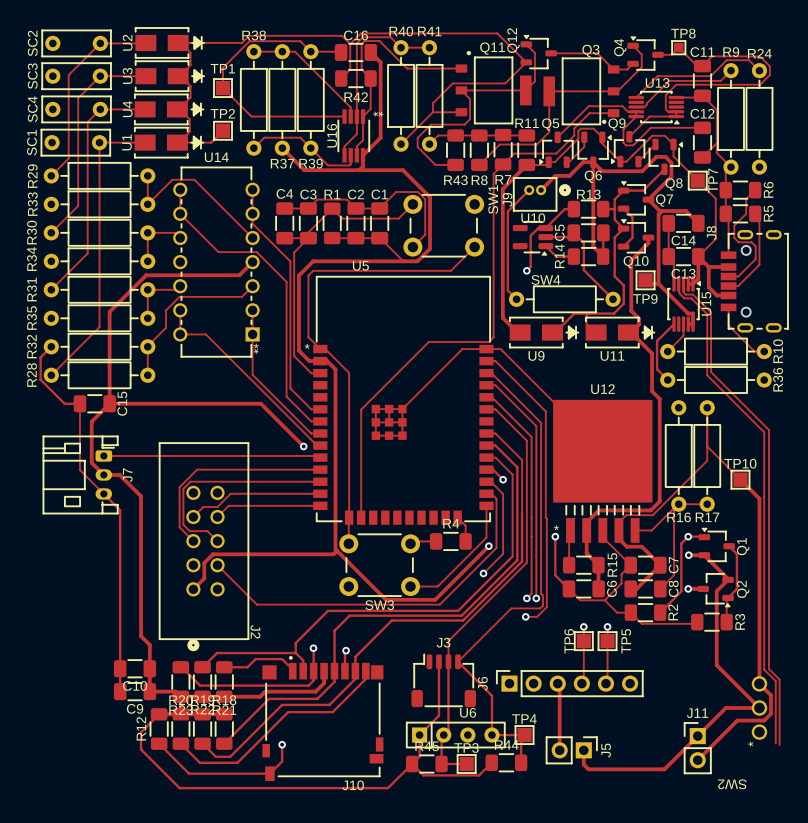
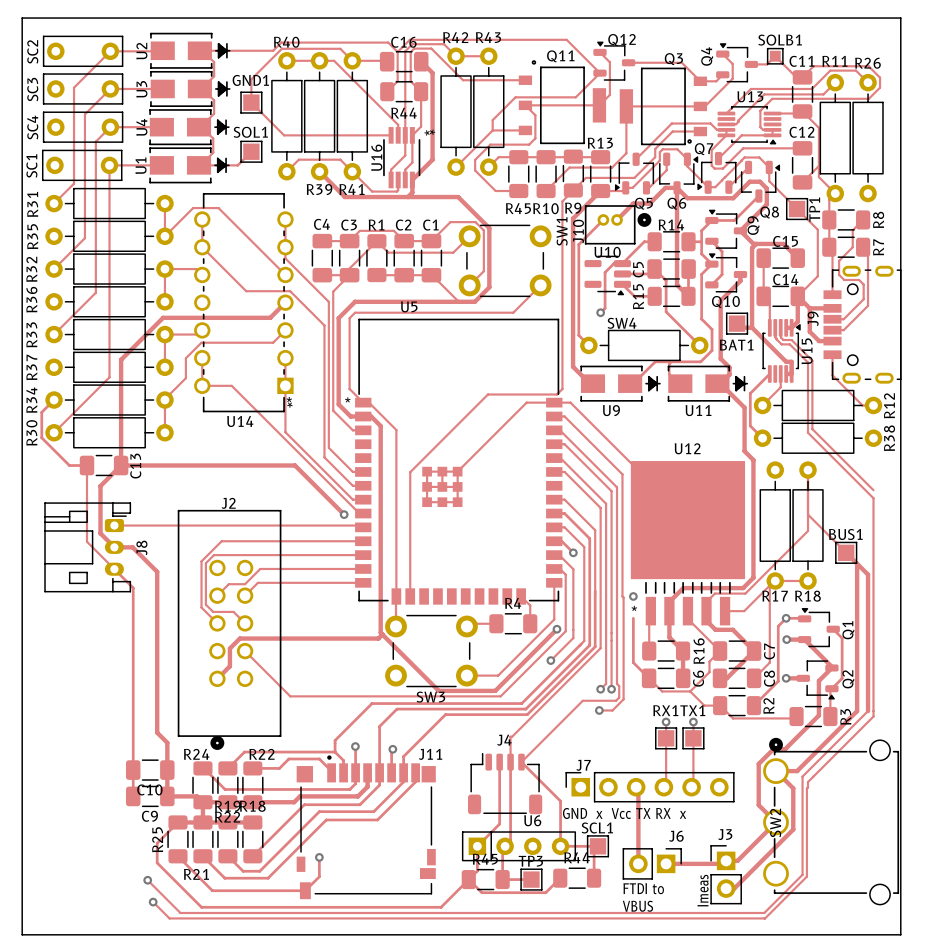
board edge: none -> (22, 18) (900, 18) (900, 934) (22, 934) (22, 18)
R40 name: R40 (401, 31) -> R42 (455, 37)
R41 name: R41 (429, 31) -> R43 (488, 37)
TP8 name: TP8 (683, 33) -> SOLB1 (780, 40)
R38 name: R38 (254, 35) -> R40 (286, 42)
Q12 name rotation: 0° (513, 40) -> 90° clockwise (622, 39)
R9 name: R9 (731, 52) -> R11 (834, 61)
R24 name: R24 (759, 53) -> R26 (867, 63)
TP1 name: TP1 (222, 68) -> GND1 (250, 80)
R42 name: R42 (356, 97) -> R44 (404, 113)
TP2 name: TP2 (222, 113) -> SOL1 (250, 132)
R11 name: R11 (527, 123) -> R13 (600, 143)
Q5 name position: Q5 (550, 124) -> Q5 (643, 203)
Q9 name rotation: 0° (617, 124) -> 90° counterclockwise (753, 225)
Q9 name position: Q9 (617, 124) -> Q9 (753, 225)
U14 name position: U14 (216, 157) -> U14 (240, 421)
R37 name: R37 (282, 163) -> R39 (319, 189)
R39 name: R39 (311, 163) -> R41 (352, 189)
R29 name: R29 (32, 176) -> R31 (32, 204)
R7 name: R7 (503, 179) -> R9 (573, 208)
R43 name: R43 (455, 180) -> R45 (518, 208)
R8 name: R8 (479, 180) -> R10 (545, 208)
TP7 name: TP7 (713, 180) -> TP1 (814, 209)
R6 name: R6 (768, 189) -> R8 (878, 219)
R13 name: R13 (588, 194) -> R14 (671, 224)
J9 name: J9 (507, 199) -> J10 (578, 231)
Q7 name position: Q7 (664, 200) -> Q7 (704, 149)
R33 name: R33 (32, 204) -> R35 (32, 236)
R5 name: R5 (768, 213) -> R7 (878, 247)
R30 name: R30 (31, 232) -> R32 (31, 269)
J8 name: J8 (711, 233) -> J9 (813, 318)
C14 name: C14 (683, 240) -> C15 (785, 241)
R14 name: R14 (559, 256) -> R15 (638, 296)
R34 name: R34 (31, 259) -> R36 (31, 299)
C13 name: C13 (683, 273) -> C14 (785, 279)
R31 name: R31 (31, 289) -> R33 (31, 334)
TP9 name: TP9 (645, 298) -> BAT1 (736, 345)
R35 name: R35 (31, 318) -> R37 (31, 367)
R32 name: R32 (31, 346) -> R34 (31, 400)
R10 name: R10 (778, 351) -> R12 (889, 405)
R28 name: R28 (31, 375) -> R30 (31, 432)
R36 name: R36 (778, 379) -> R38 (889, 438)
C15 name: C15 (122, 403) -> C13 (135, 466)
track: (764, 425) (768, 430) (768, 668) (779, 679) (779, 745) -> none
TP10 name: TP10 (740, 463) -> BUS1 (845, 534)
J7 name: J7 (127, 475) -> J8 (141, 547)
track: none -> (857, 563) (857, 711) (797, 771) (776, 771) (793, 788) (793, 829) (734, 888) (726, 888)
R16 name: R16 (679, 517) -> R17 (775, 596)
R17 name: R17 (707, 517) -> R18 (807, 596)
via position: (555, 536) -> (633, 596)
R15 name: R15 (612, 564) -> R16 (699, 651)
track: (759, 617) (759, 683) (770, 695) (770, 713) (764, 720) (737, 720) (697, 760) -> (868, 711) (802, 776) (802, 874) (764, 912) (180, 912) (147, 880)
track: (716, 621) (716, 665) (759, 707) (725, 707) (664, 769) (588, 769) (583, 764) (583, 750) -> (818, 715) (785, 749) (773, 749) (758, 763) (758, 805) (776, 822) (737, 860) (723, 860) (720, 863) (666, 863)
track: (764, 622) (764, 669) (775, 681) (775, 743) -> (873, 716) (808, 782) (806, 876) (765, 918) (169, 918) (153, 902)
J2 name rotation: 0° (255, 631) -> 90° counterclockwise (228, 503)
J2 name position: J2 (255, 631) -> J2 (228, 503)
TP6 name: TP6 (569, 641) -> RX1 (665, 710)
TP5 name: TP5 (626, 641) -> TX1 (692, 710)
J3 name: J3 (443, 642) -> J4 (504, 740)
SW2 footprint: [751, 676, 768, 740] -> [763, 737, 900, 905]
J6 name: J6 (482, 683) -> J7 (583, 765)
R20 name: R20 (181, 700) -> R21 (196, 874)
text: none -> GND x Vcc TX RX x (624, 813)
R23 name: R23 (181, 710) -> R24 (196, 754)
R21 name: R21 (224, 710) -> R22 (261, 754)
TP4 name: TP4 (524, 719) -> SCL1 (597, 827)
R12 name: R12 (141, 728) -> R25 (157, 839)
J11: (697, 748) -> none
J5 name: J5 (606, 750) -> J6 (676, 836)
J3: none -> (726, 874)
via: none -> (147, 880)
text: none -> FTDI to (643, 888)
text: none -> Imeas (703, 890)
via: none -> (153, 902)
SW2 name position: SW2 (732, 784) -> SW2 (775, 822)
J10 name: J10 (353, 785) -> J11 (430, 754)
text: none -> VBUS (637, 906)

